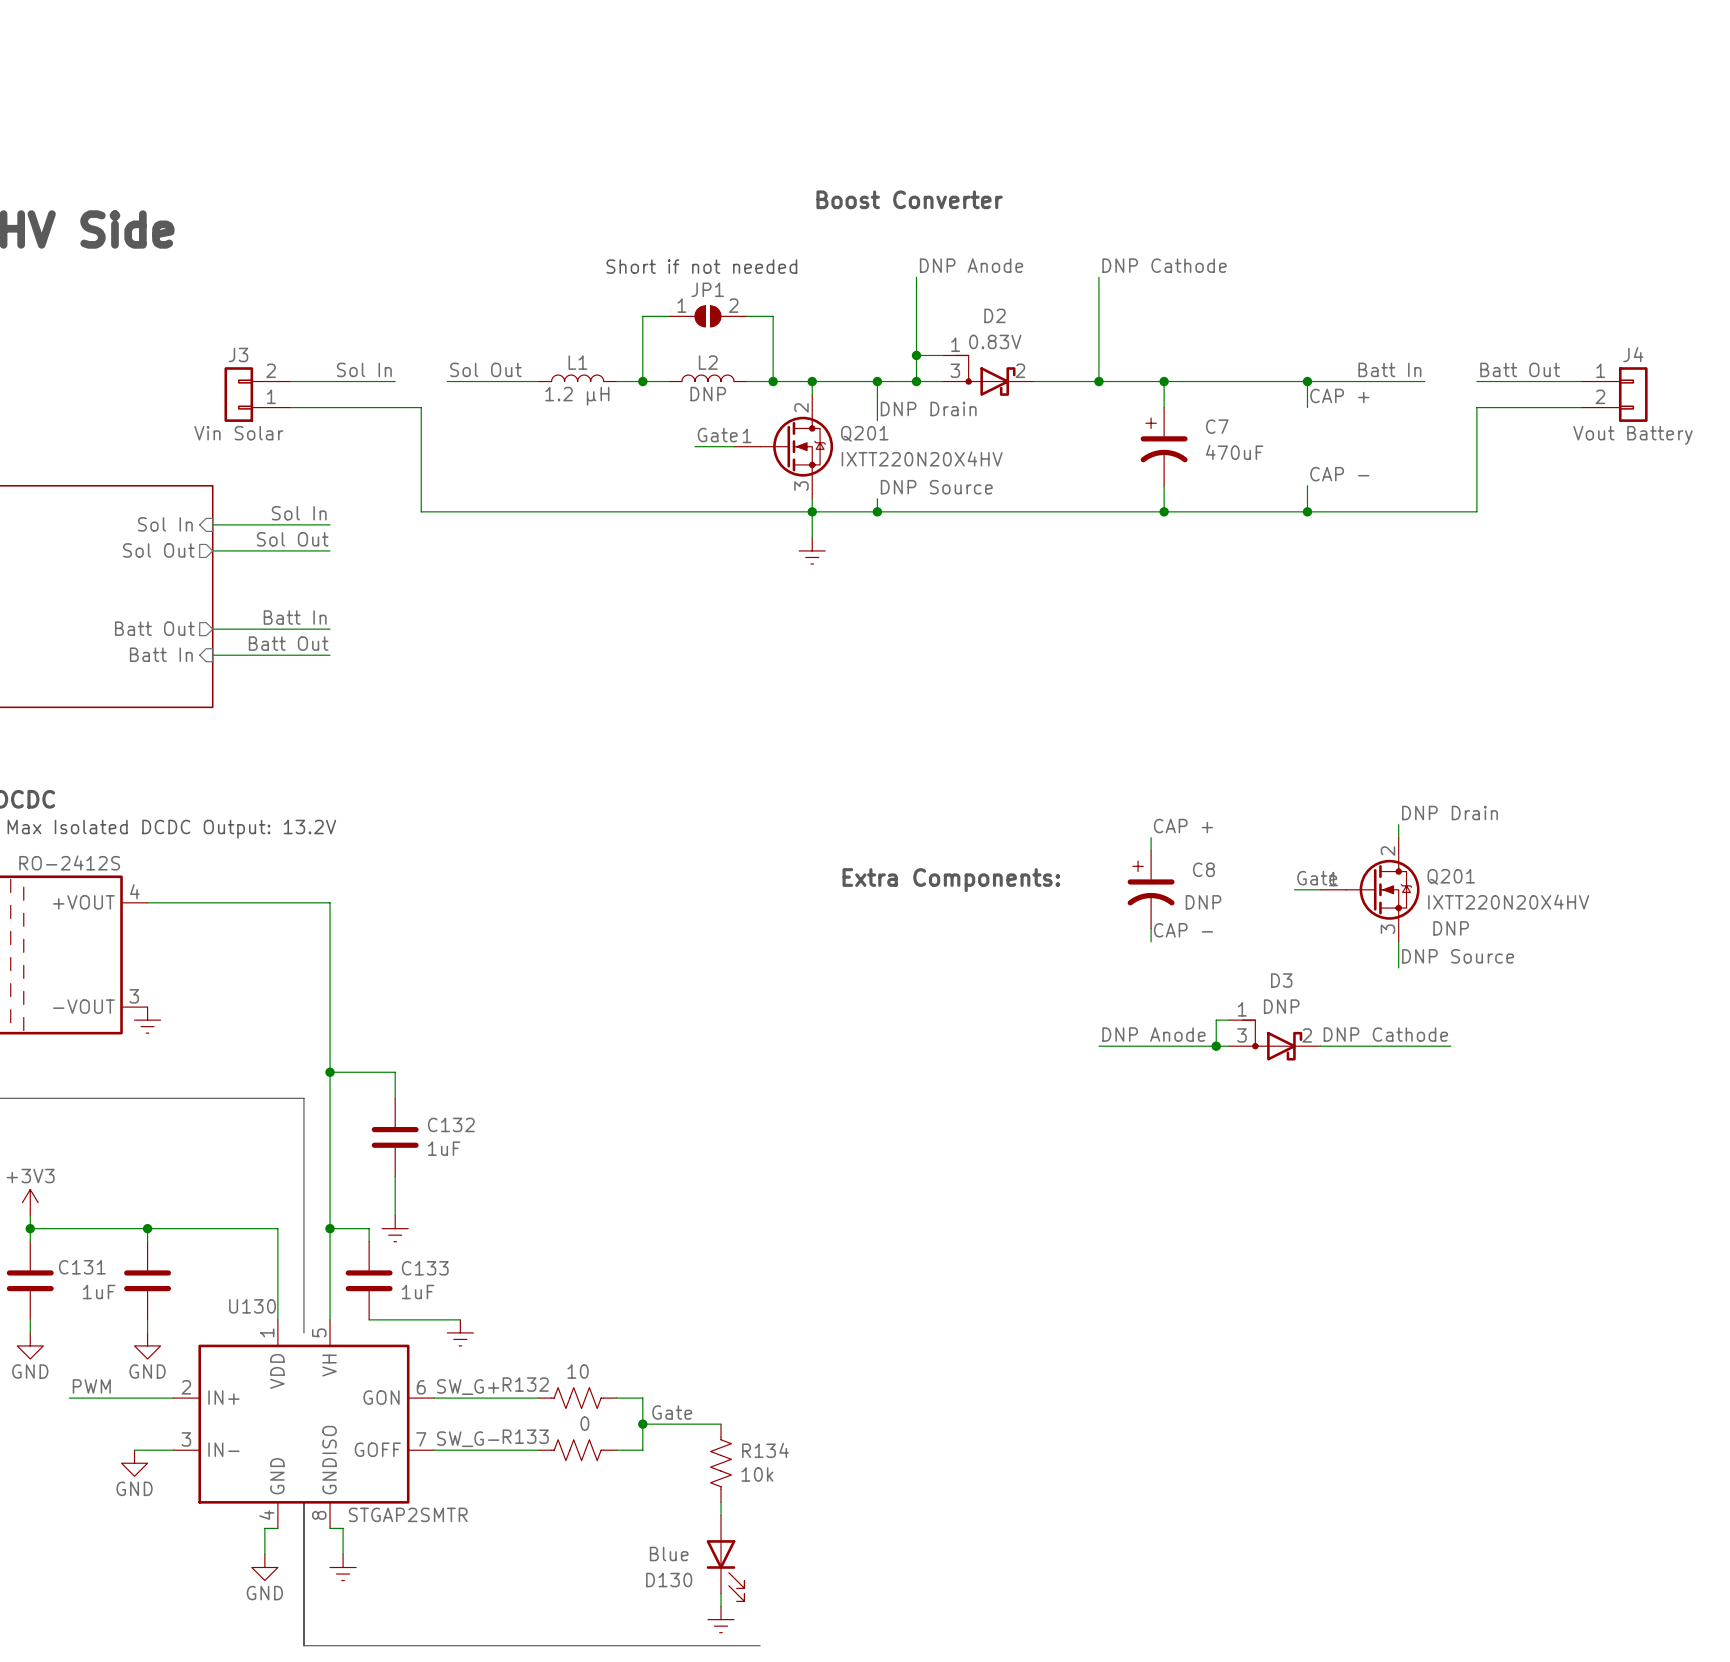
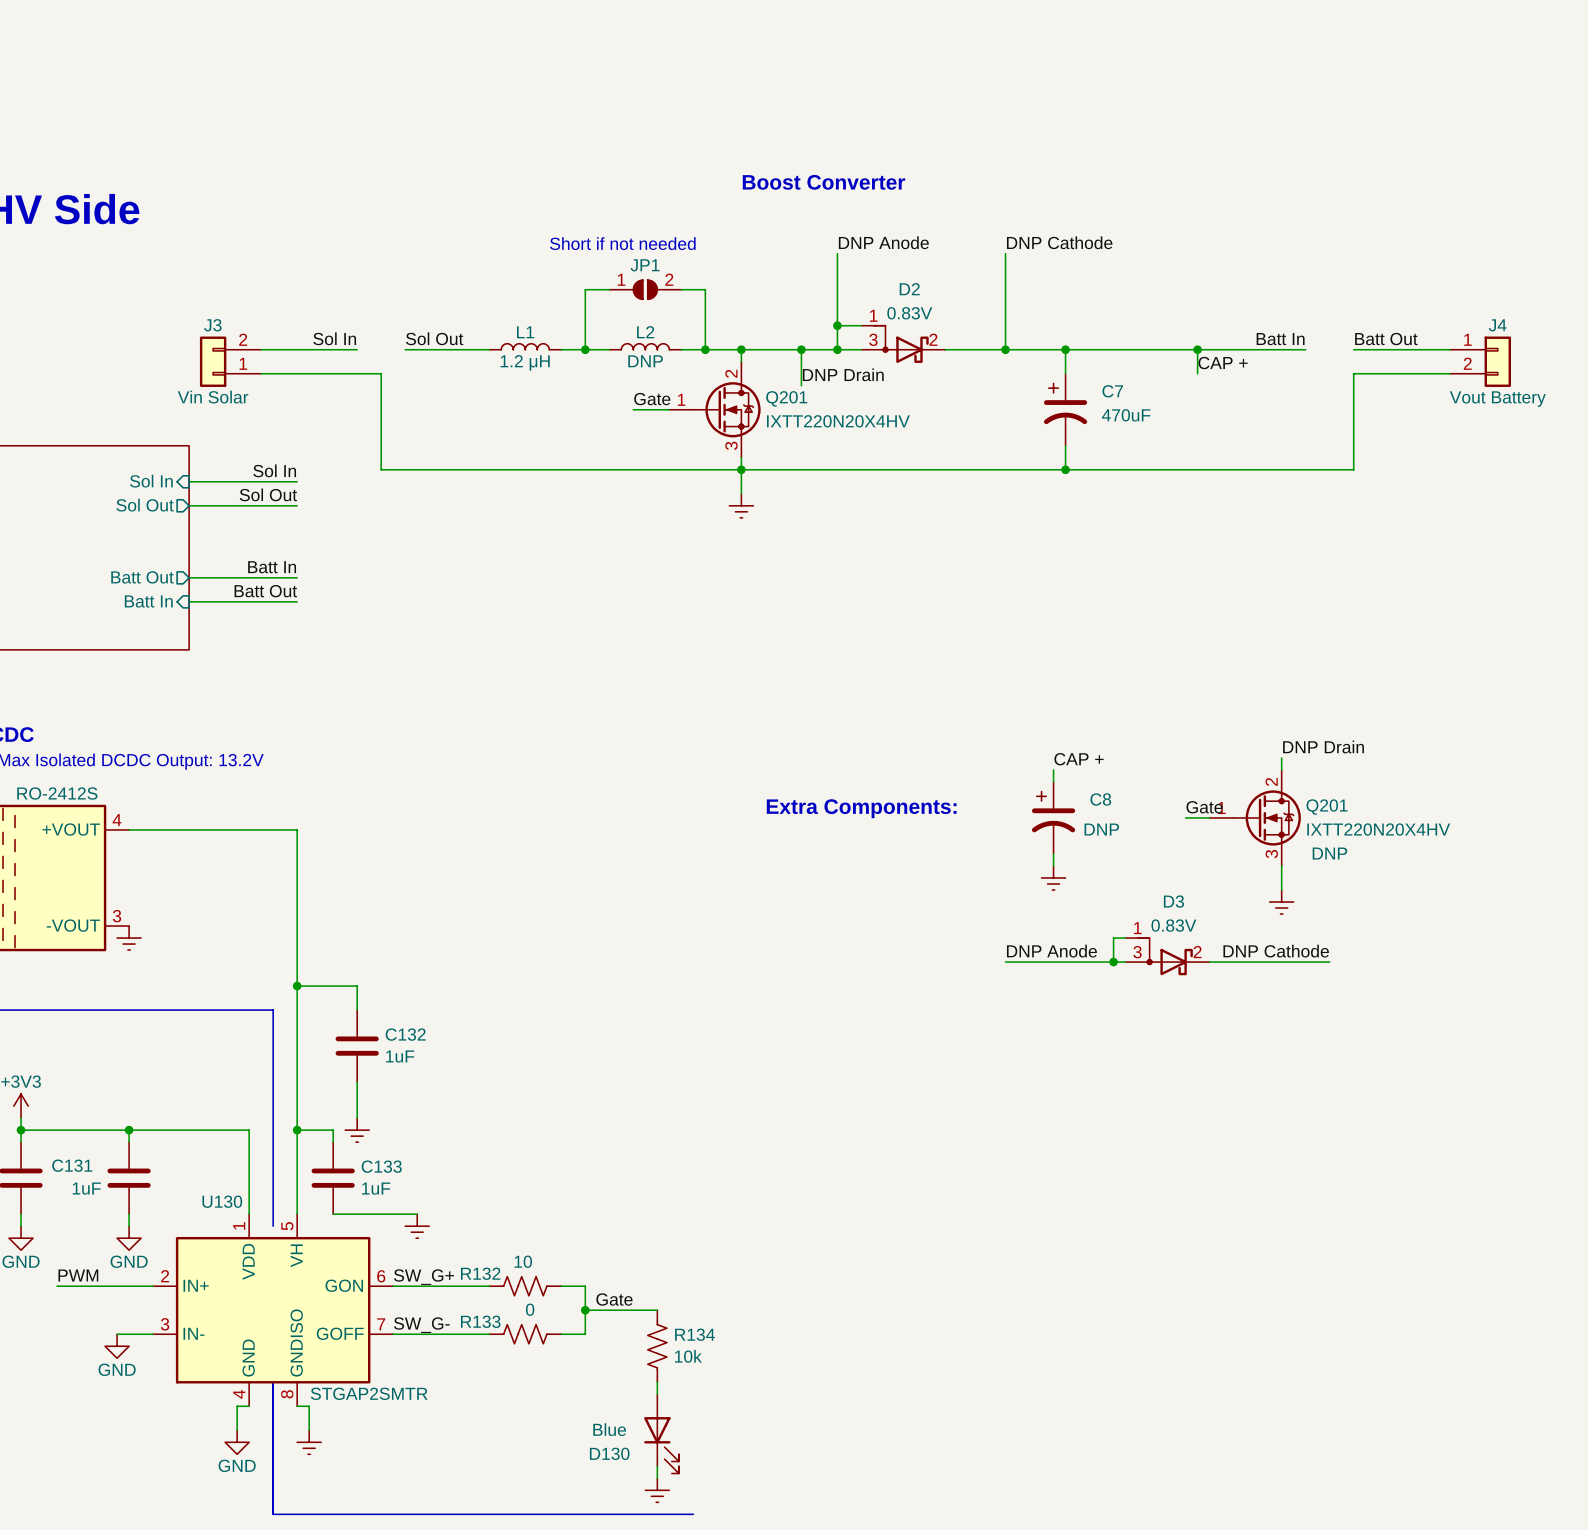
label: CAP - (1339, 474) -> none
wire: (1307, 485) (1307, 511) -> none
label: DNP Source (936, 487) -> none
wire: (877, 498) (877, 511) -> none
junction: (877, 511) -> none
junction: (1307, 511) -> none
label: CAP - (1183, 930) -> none
power symbol: none -> (1053, 878)
label: DNP Source (1458, 956) -> none
power symbol: none -> (1281, 902)
D3 text: DNP (1281, 1006) -> none
D3 value: none -> 0.83V (1173, 925)

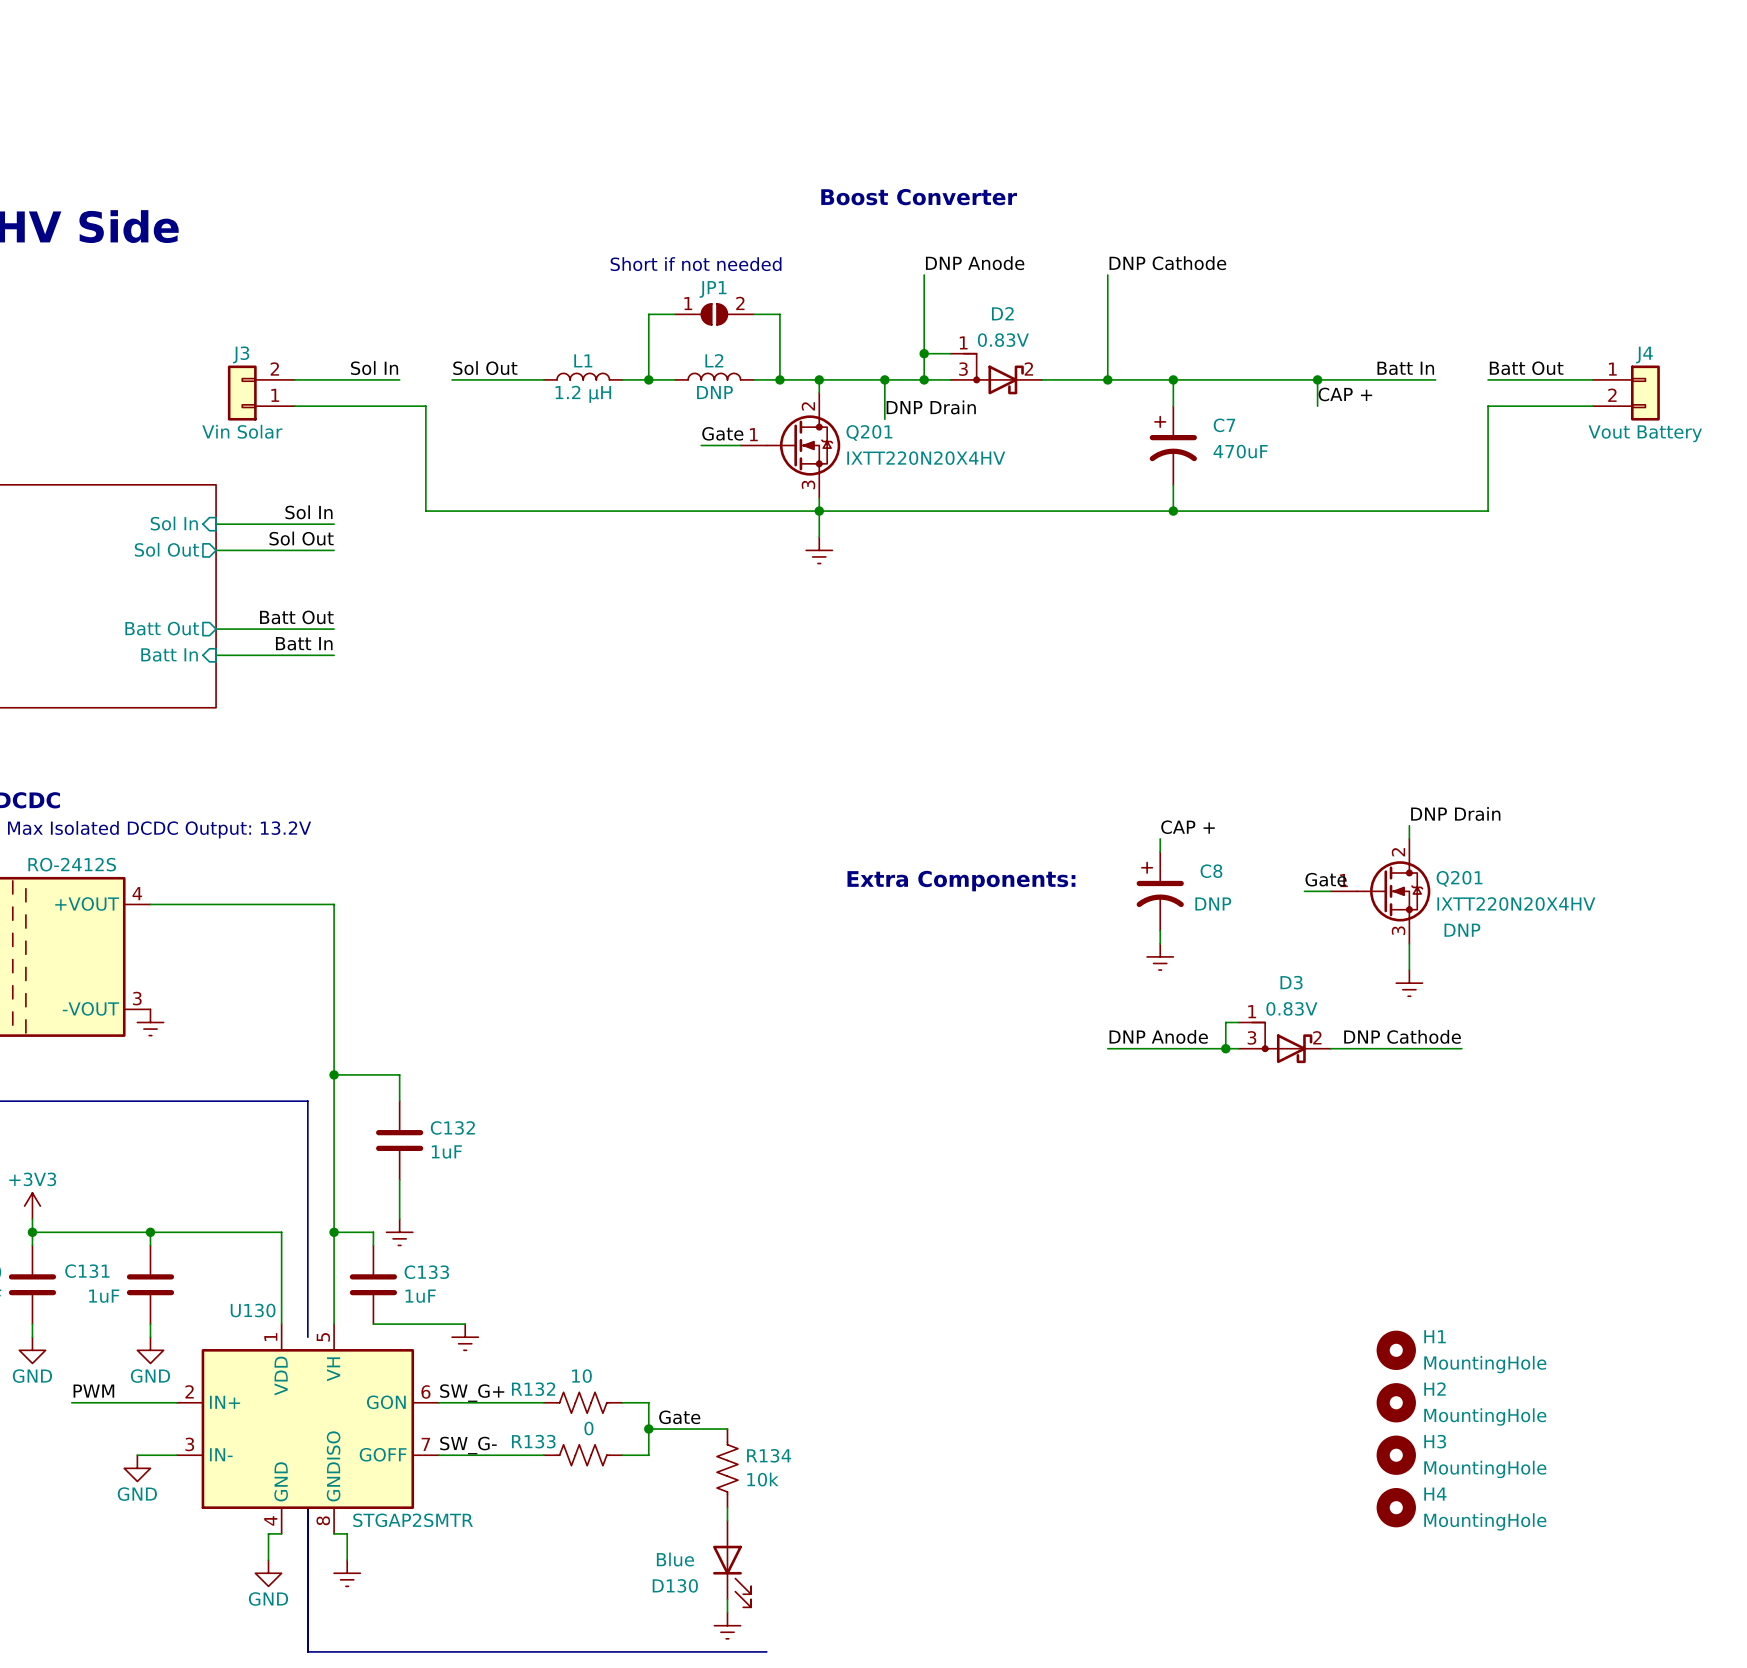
label: Batt In (272, 567) -> Batt Out (296, 617)
label: Batt Out (265, 591) -> Batt In (304, 643)
H1: none -> MountingHole (1396, 1350)
H2: none -> MountingHole (1396, 1402)
H3: none -> MountingHole (1396, 1455)
H4: none -> MountingHole (1396, 1507)

